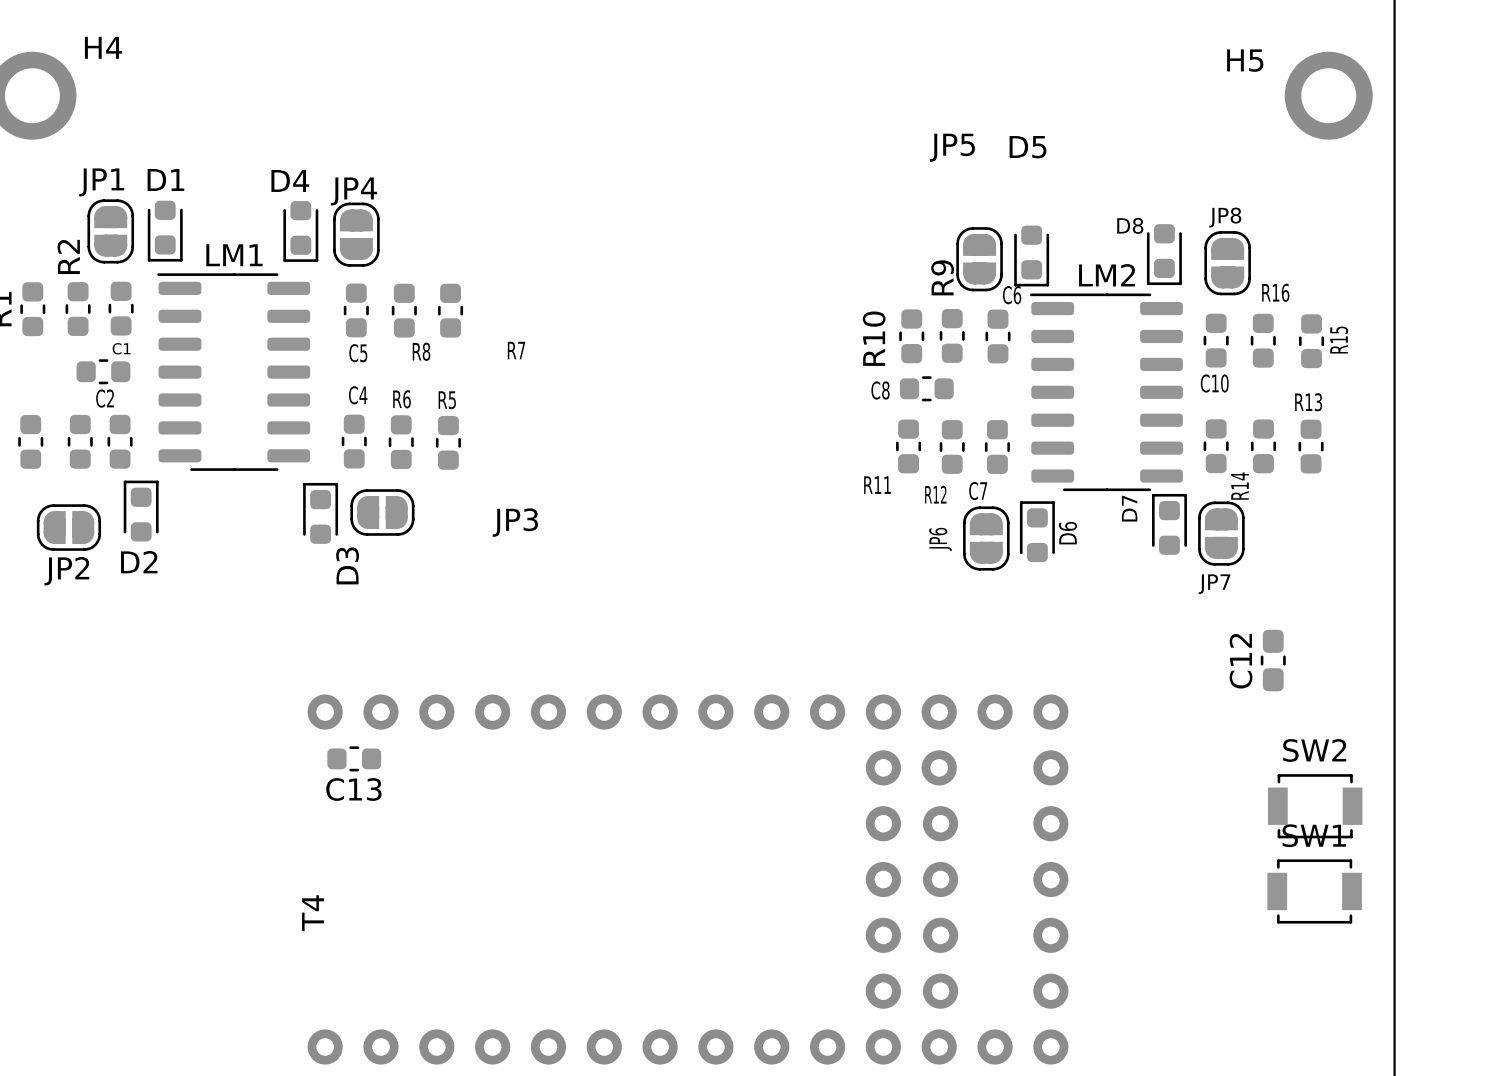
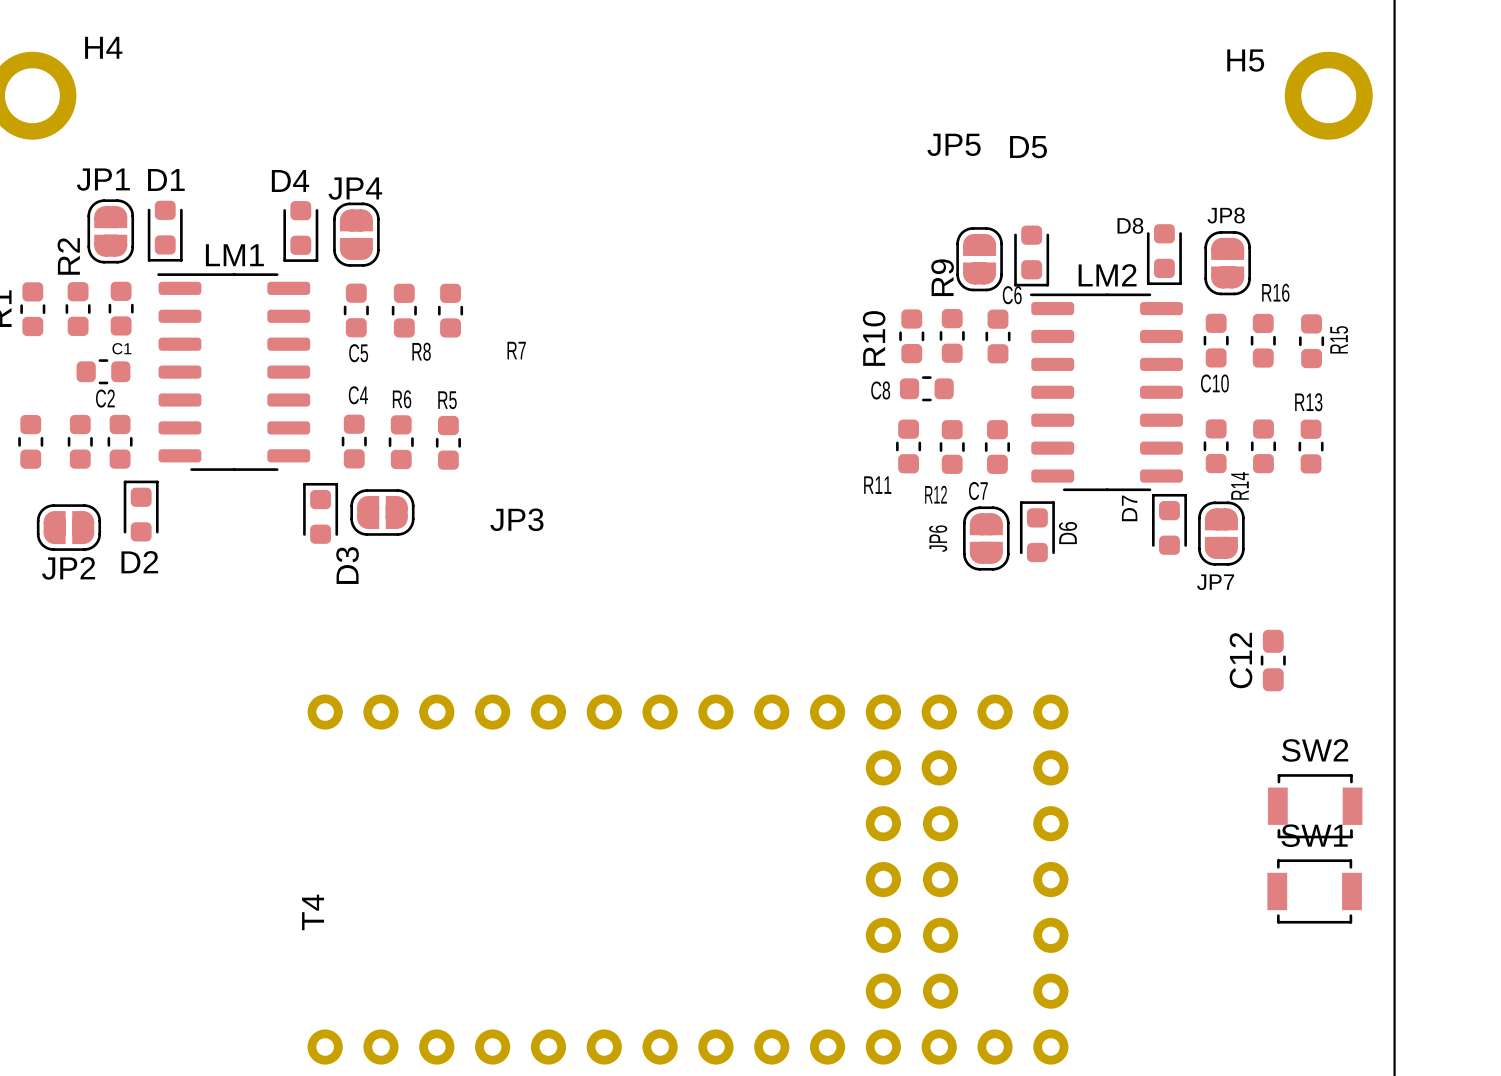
C13: (354, 758) -> none

